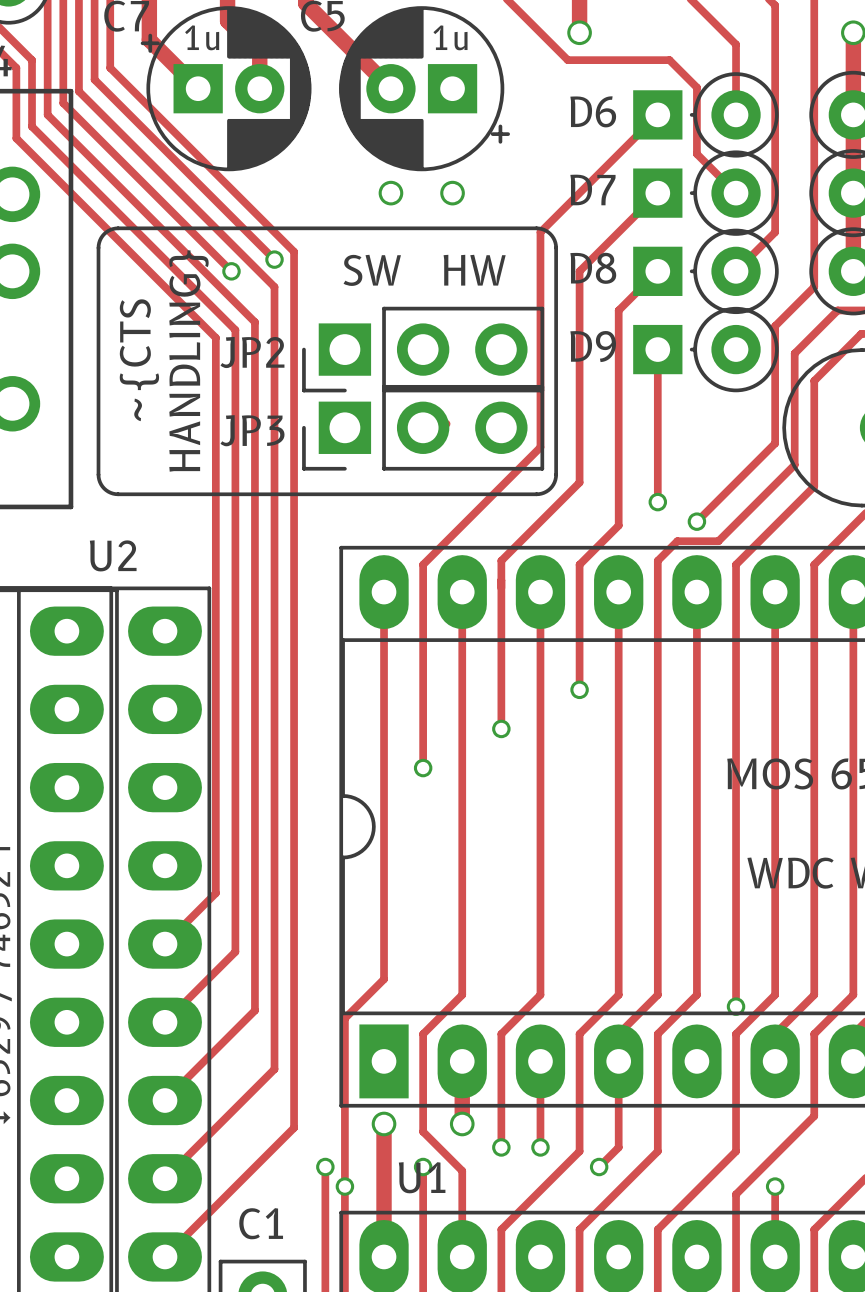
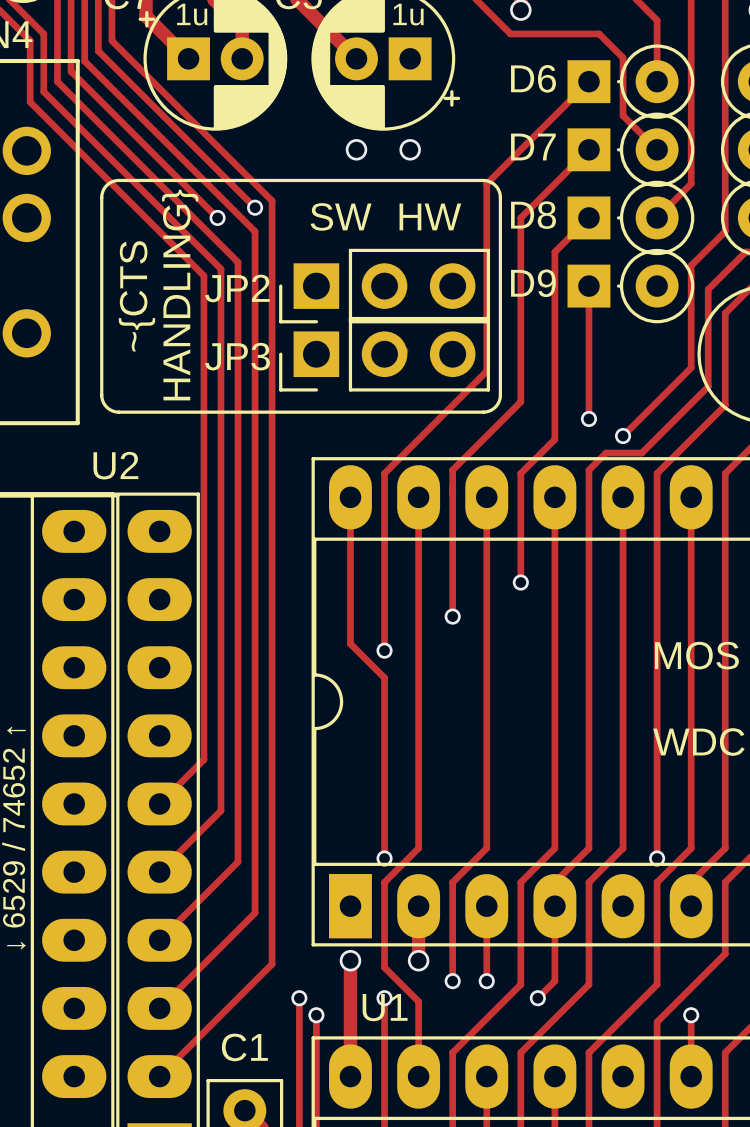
track: (384, 760) (384, 979) (344, 1018) (344, 1186) -> (350, 643) (384, 677) (384, 858)
via: none -> (384, 858)

